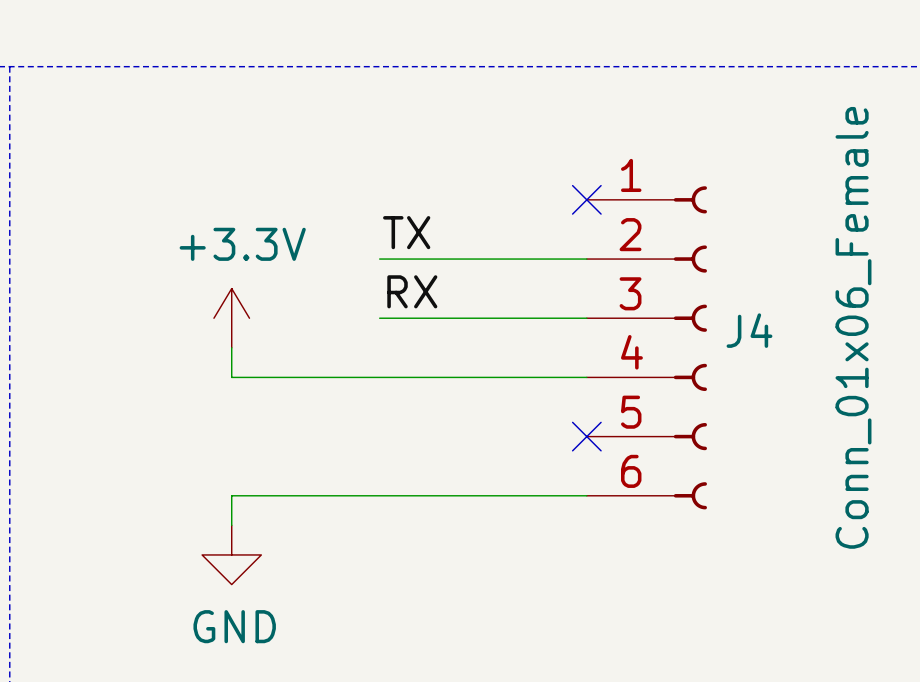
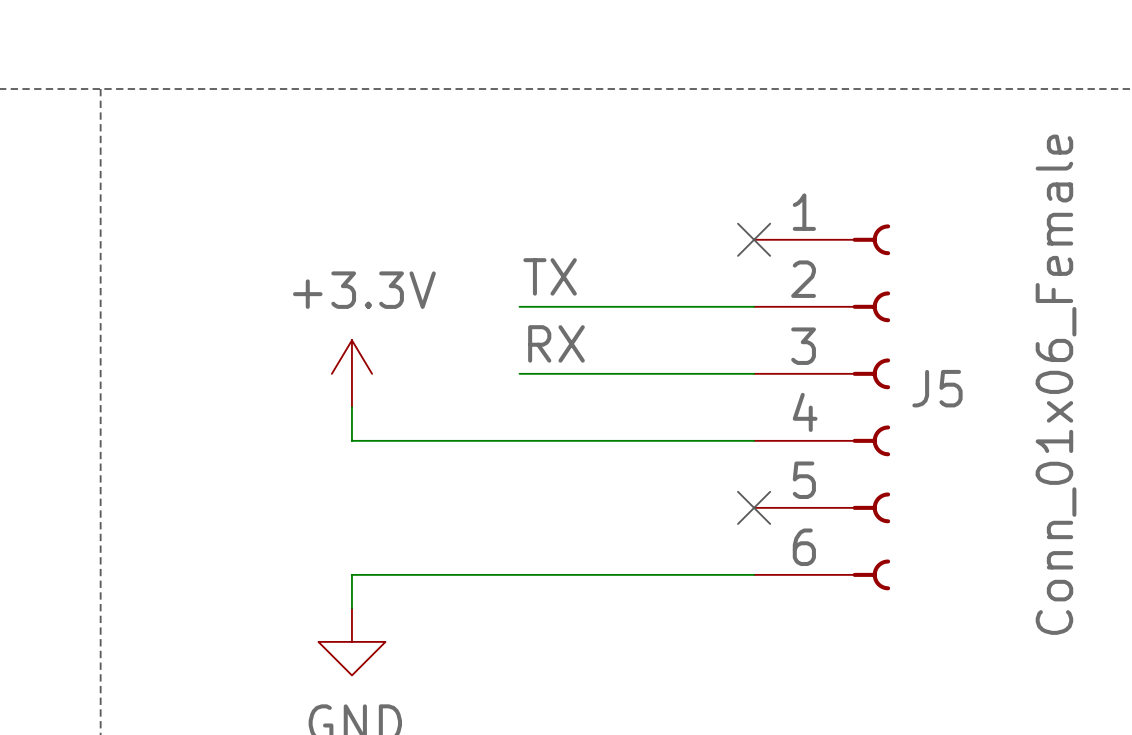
J4 name: J4 (749, 330) -> J5 (937, 388)

